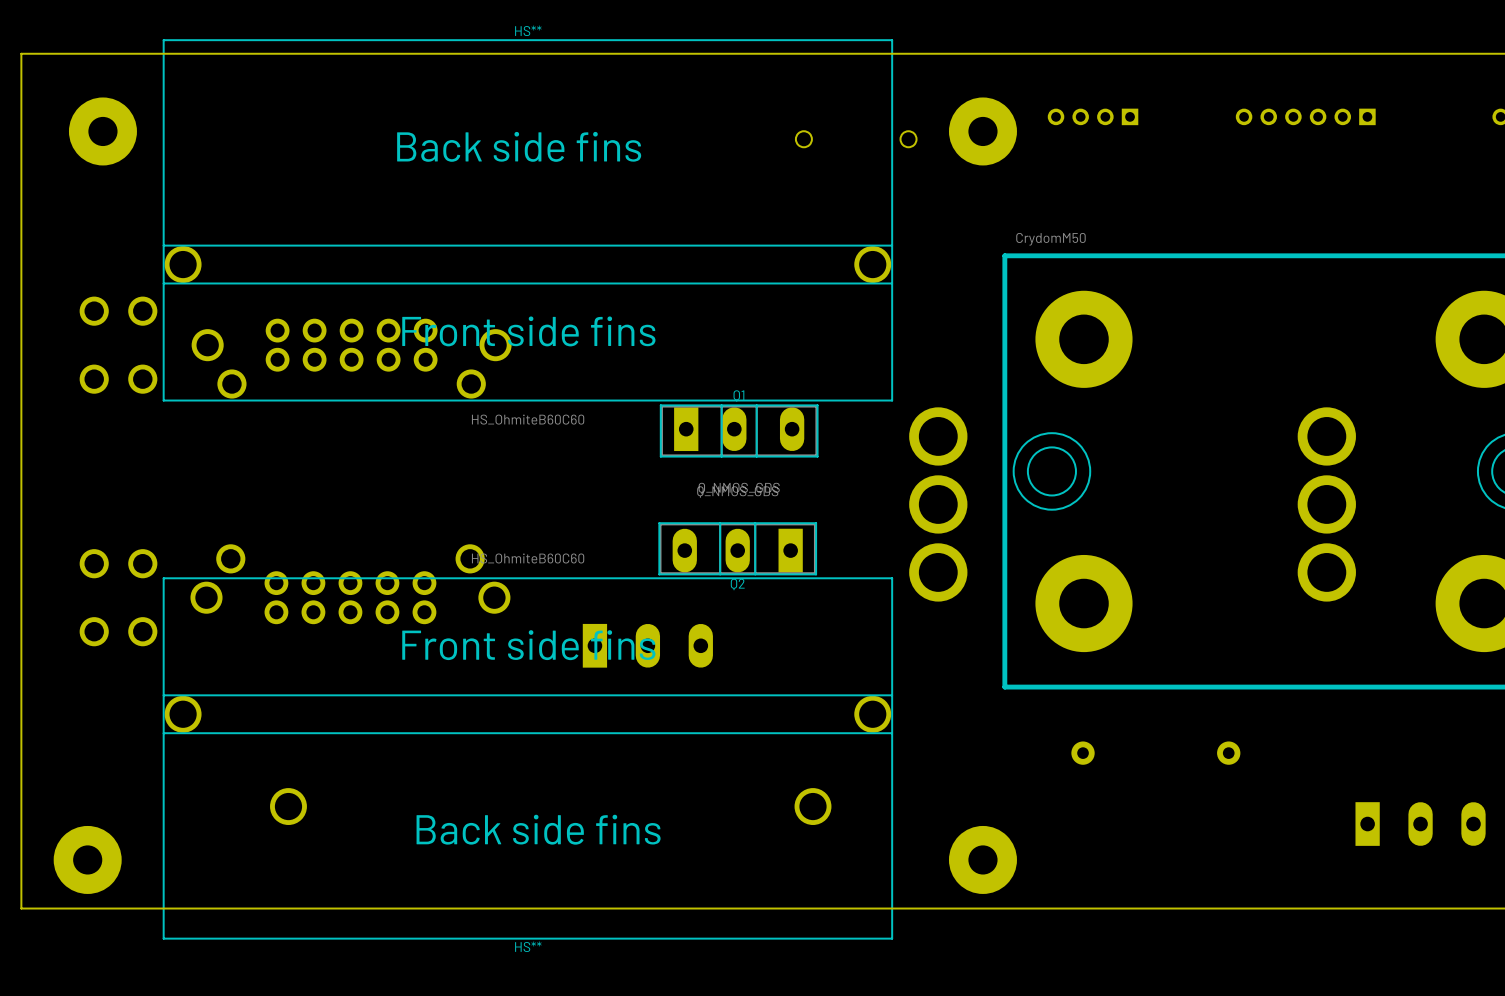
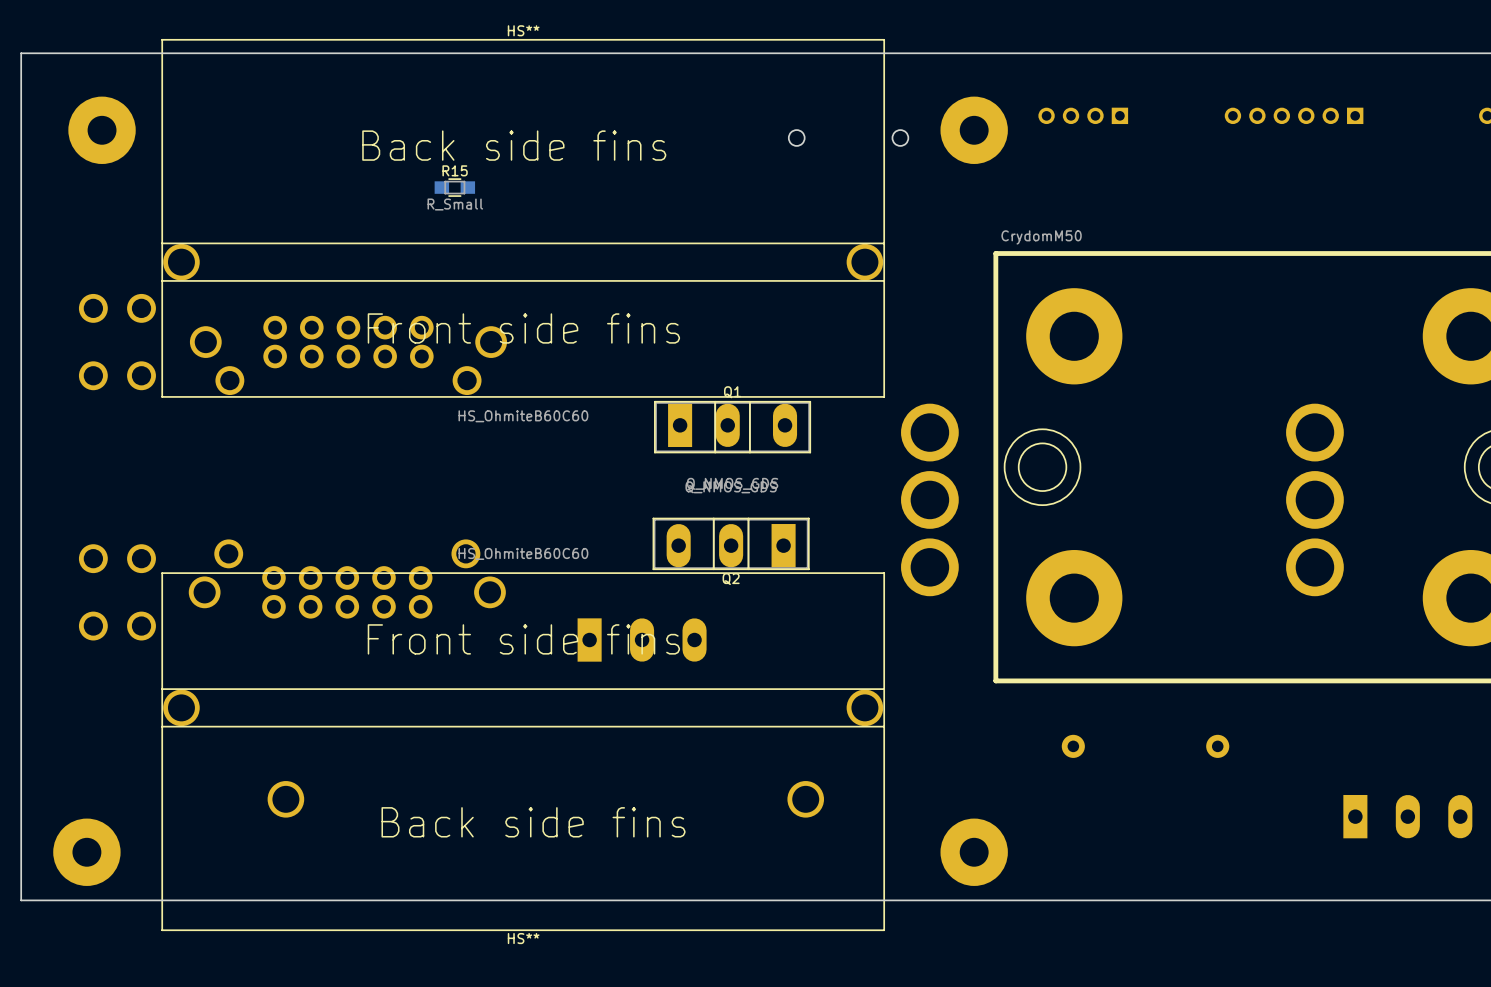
R15: none -> R_Small (454, 187)

